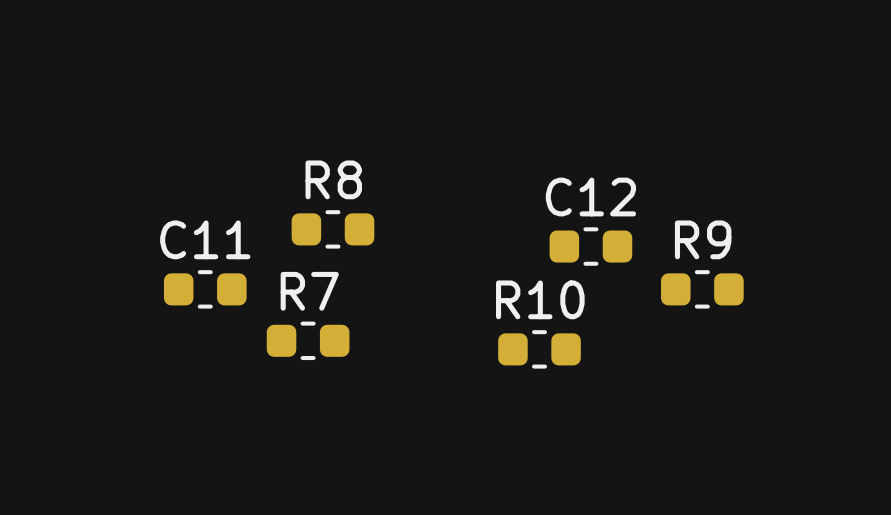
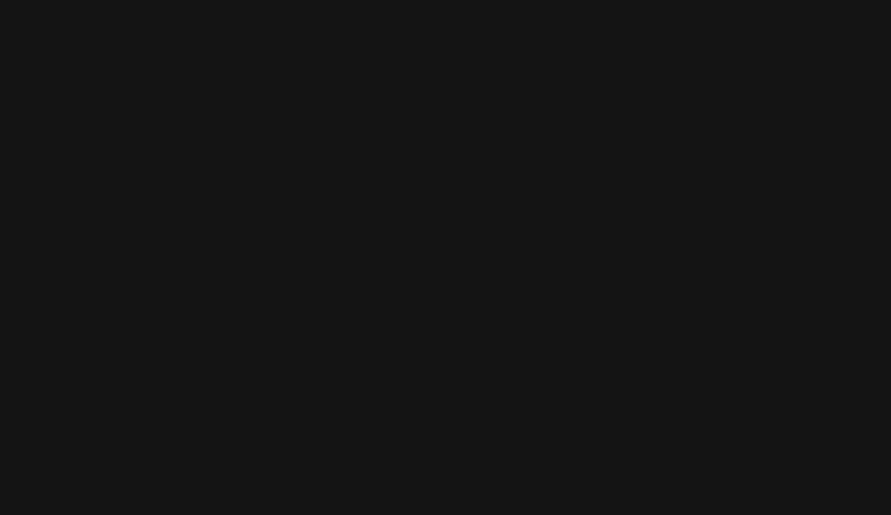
R8: (332, 229) -> none
C12: (590, 246) -> none
C11: (205, 289) -> none
R9: (702, 289) -> none
R7: (308, 340) -> none
R10: (539, 349) -> none

